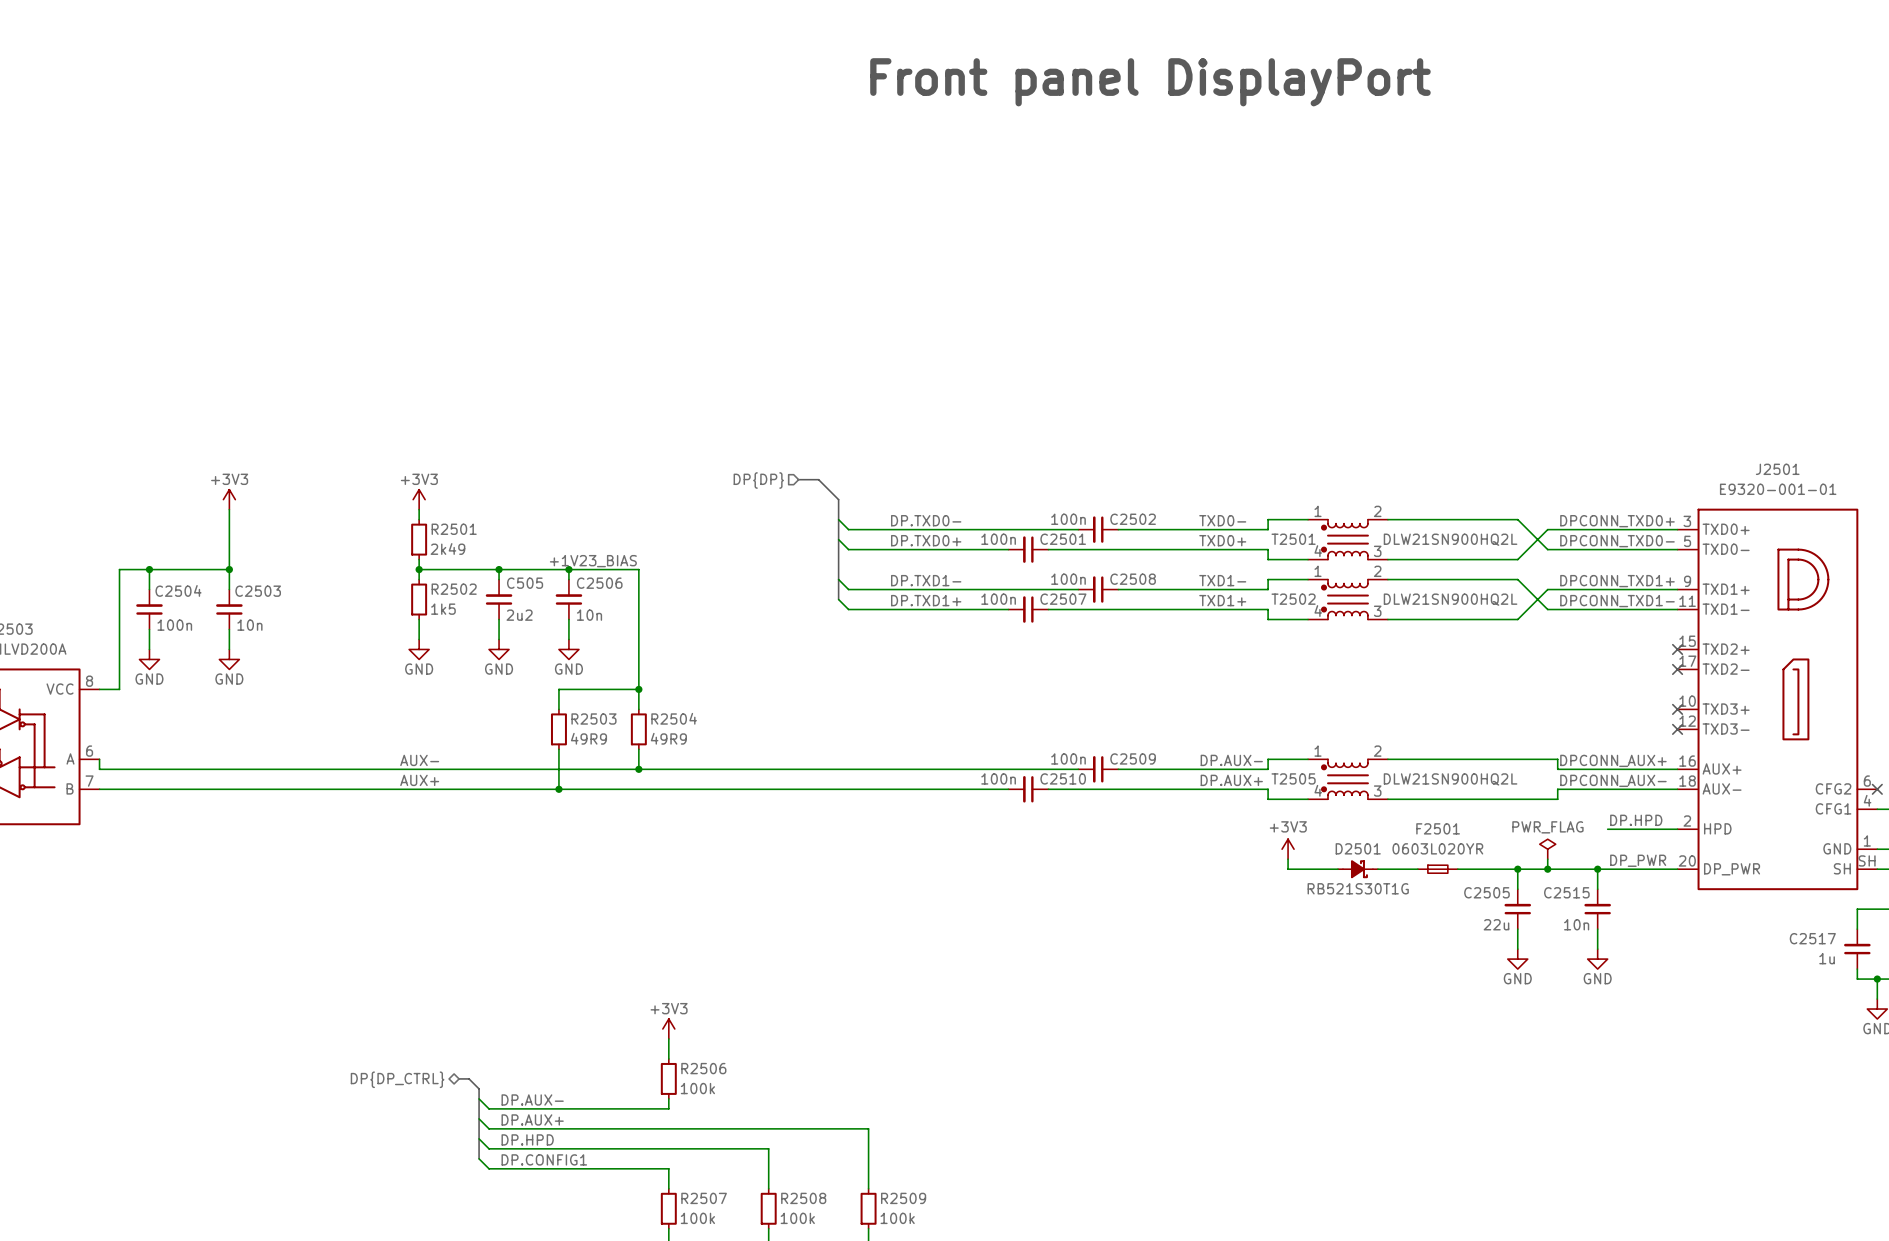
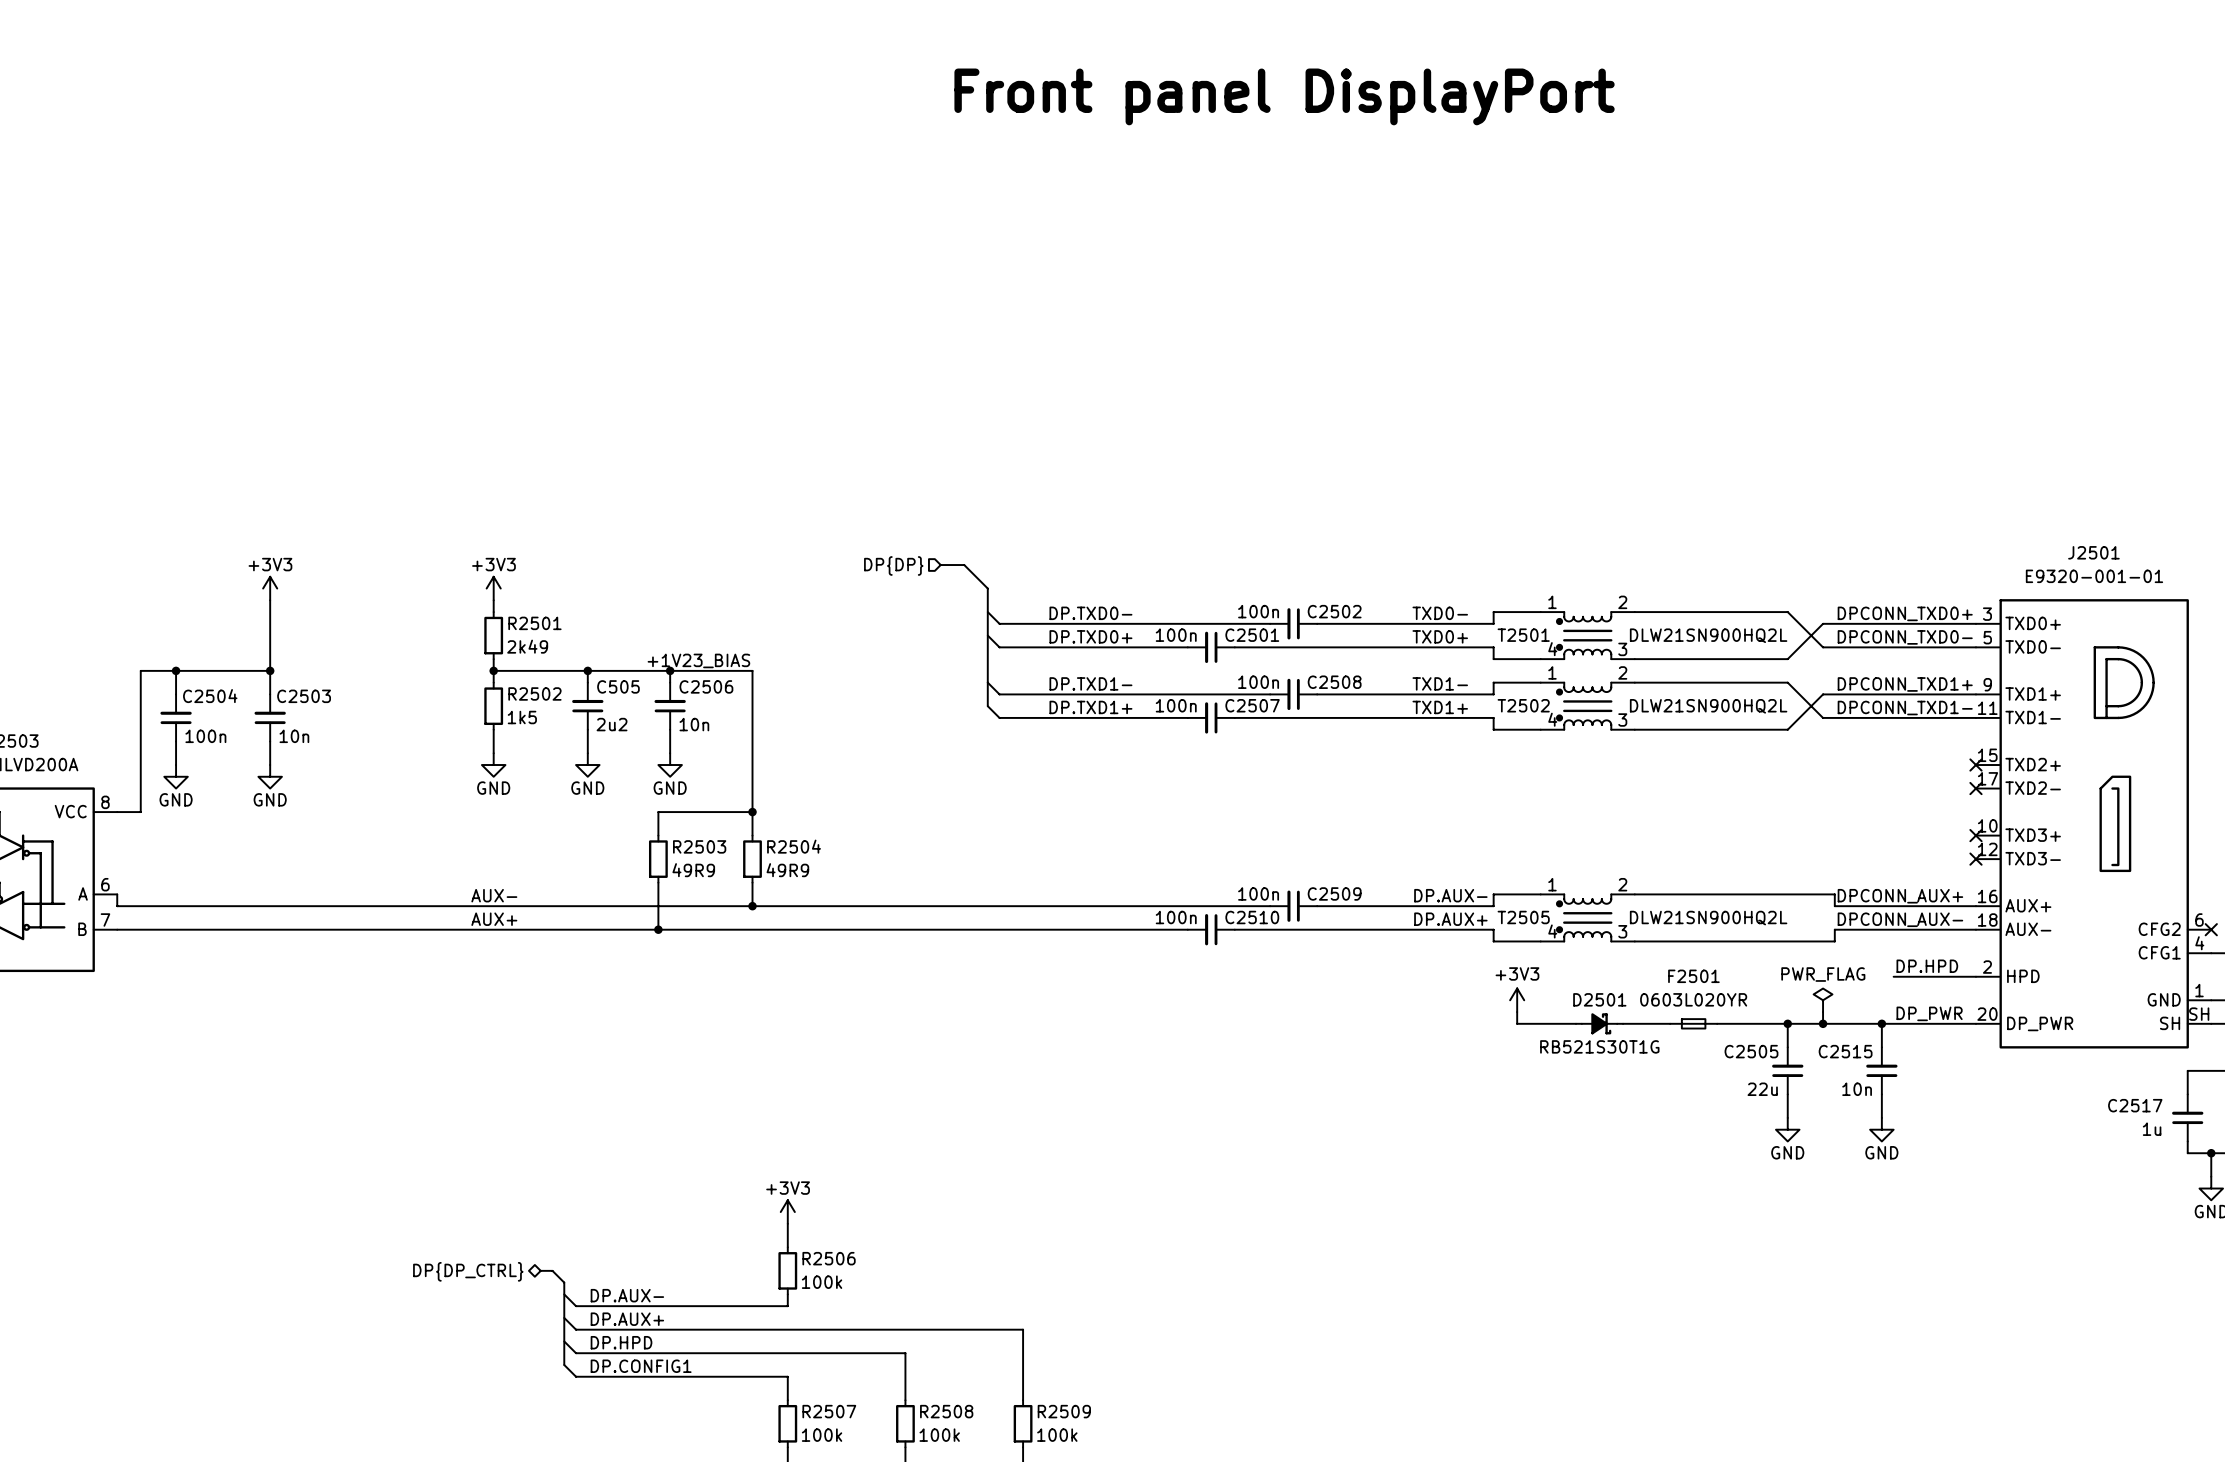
text position: Front panel DisplayPort (1150, 82) -> Front panel DisplayPort (1284, 96)

